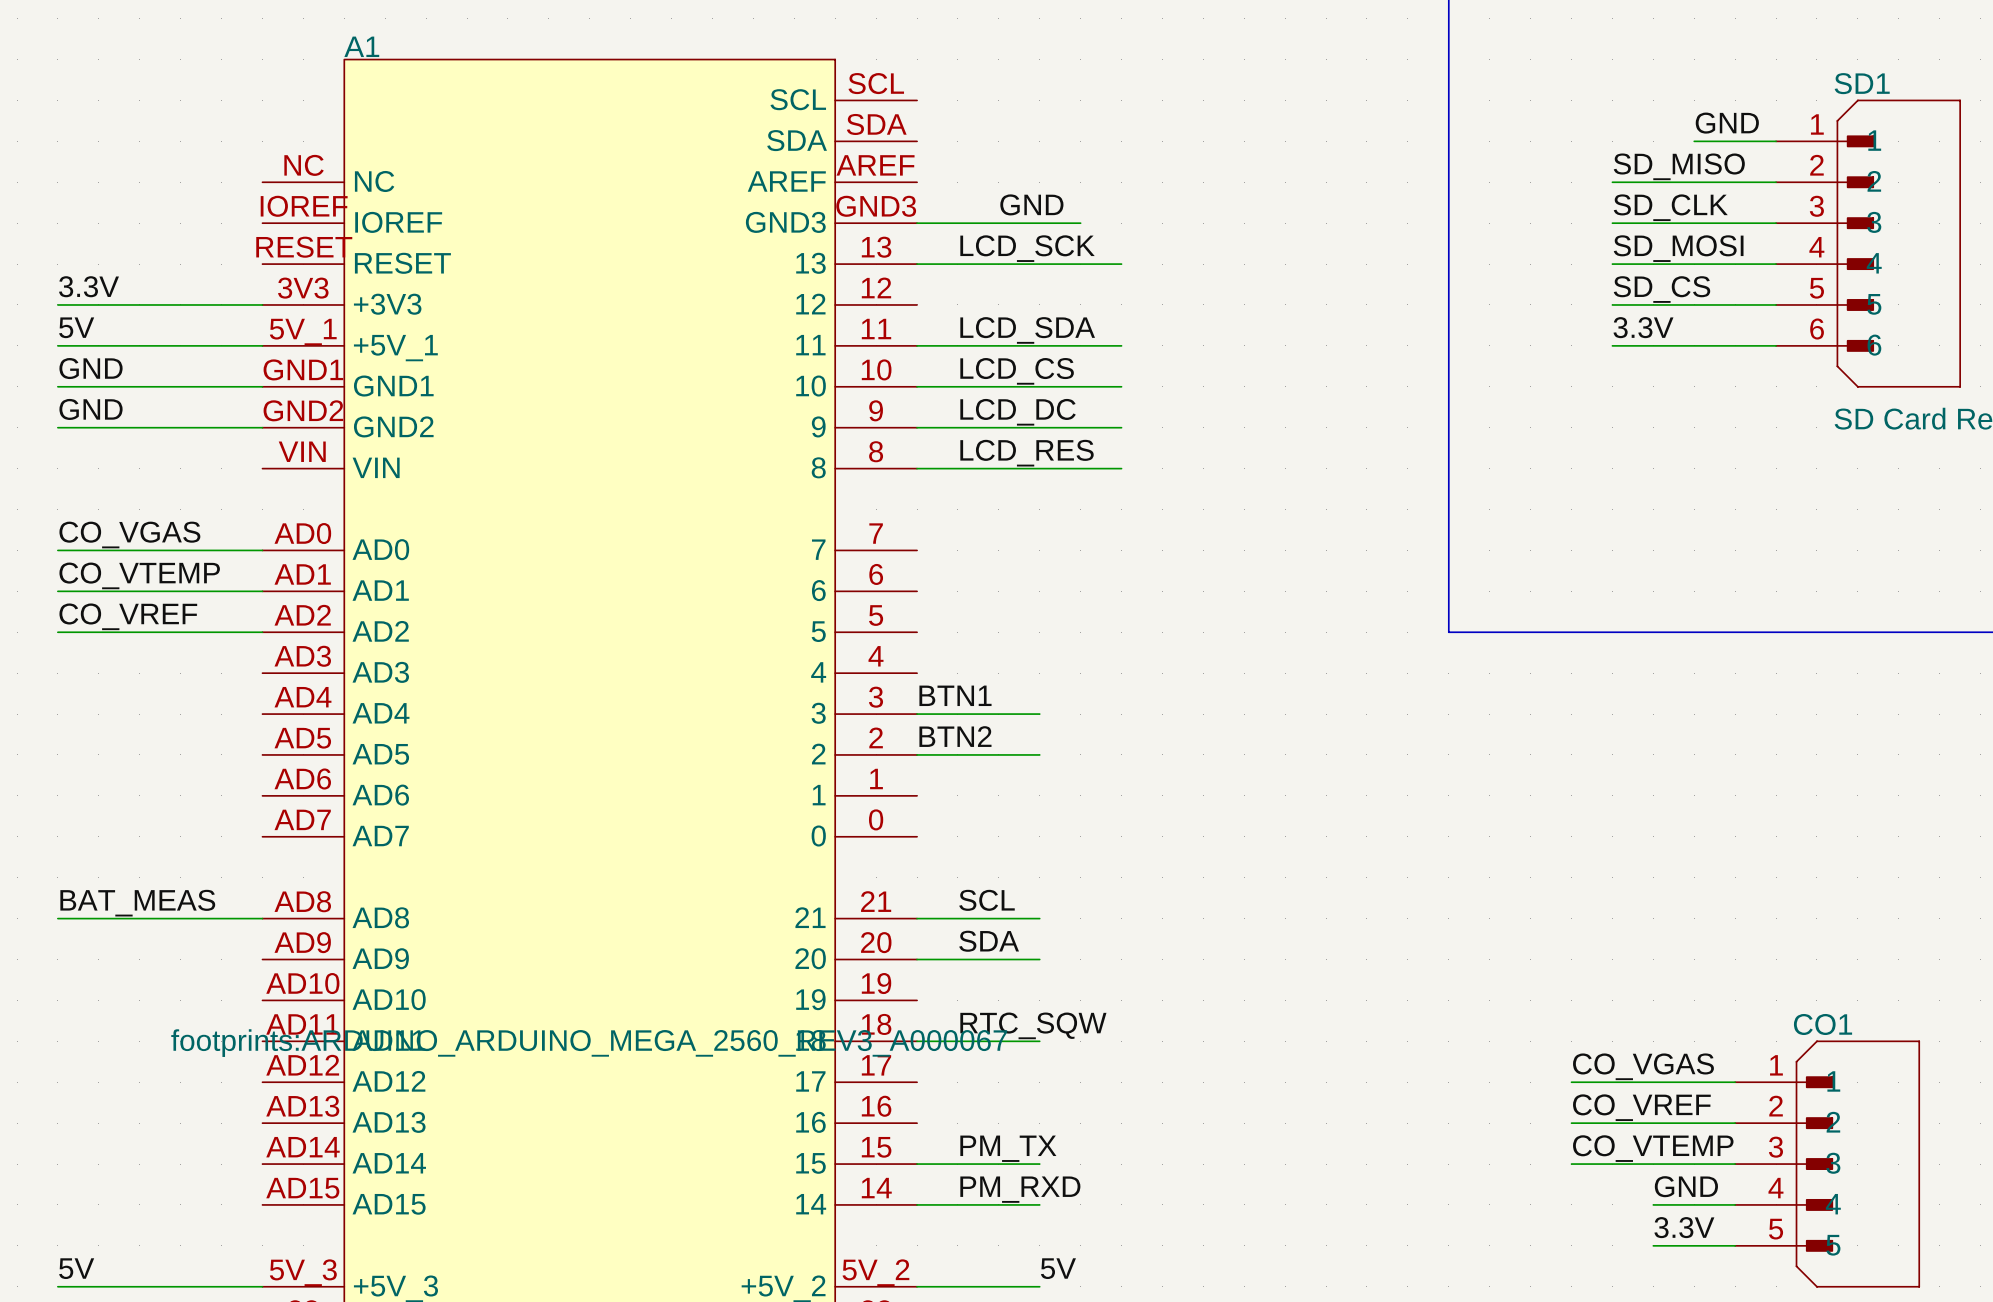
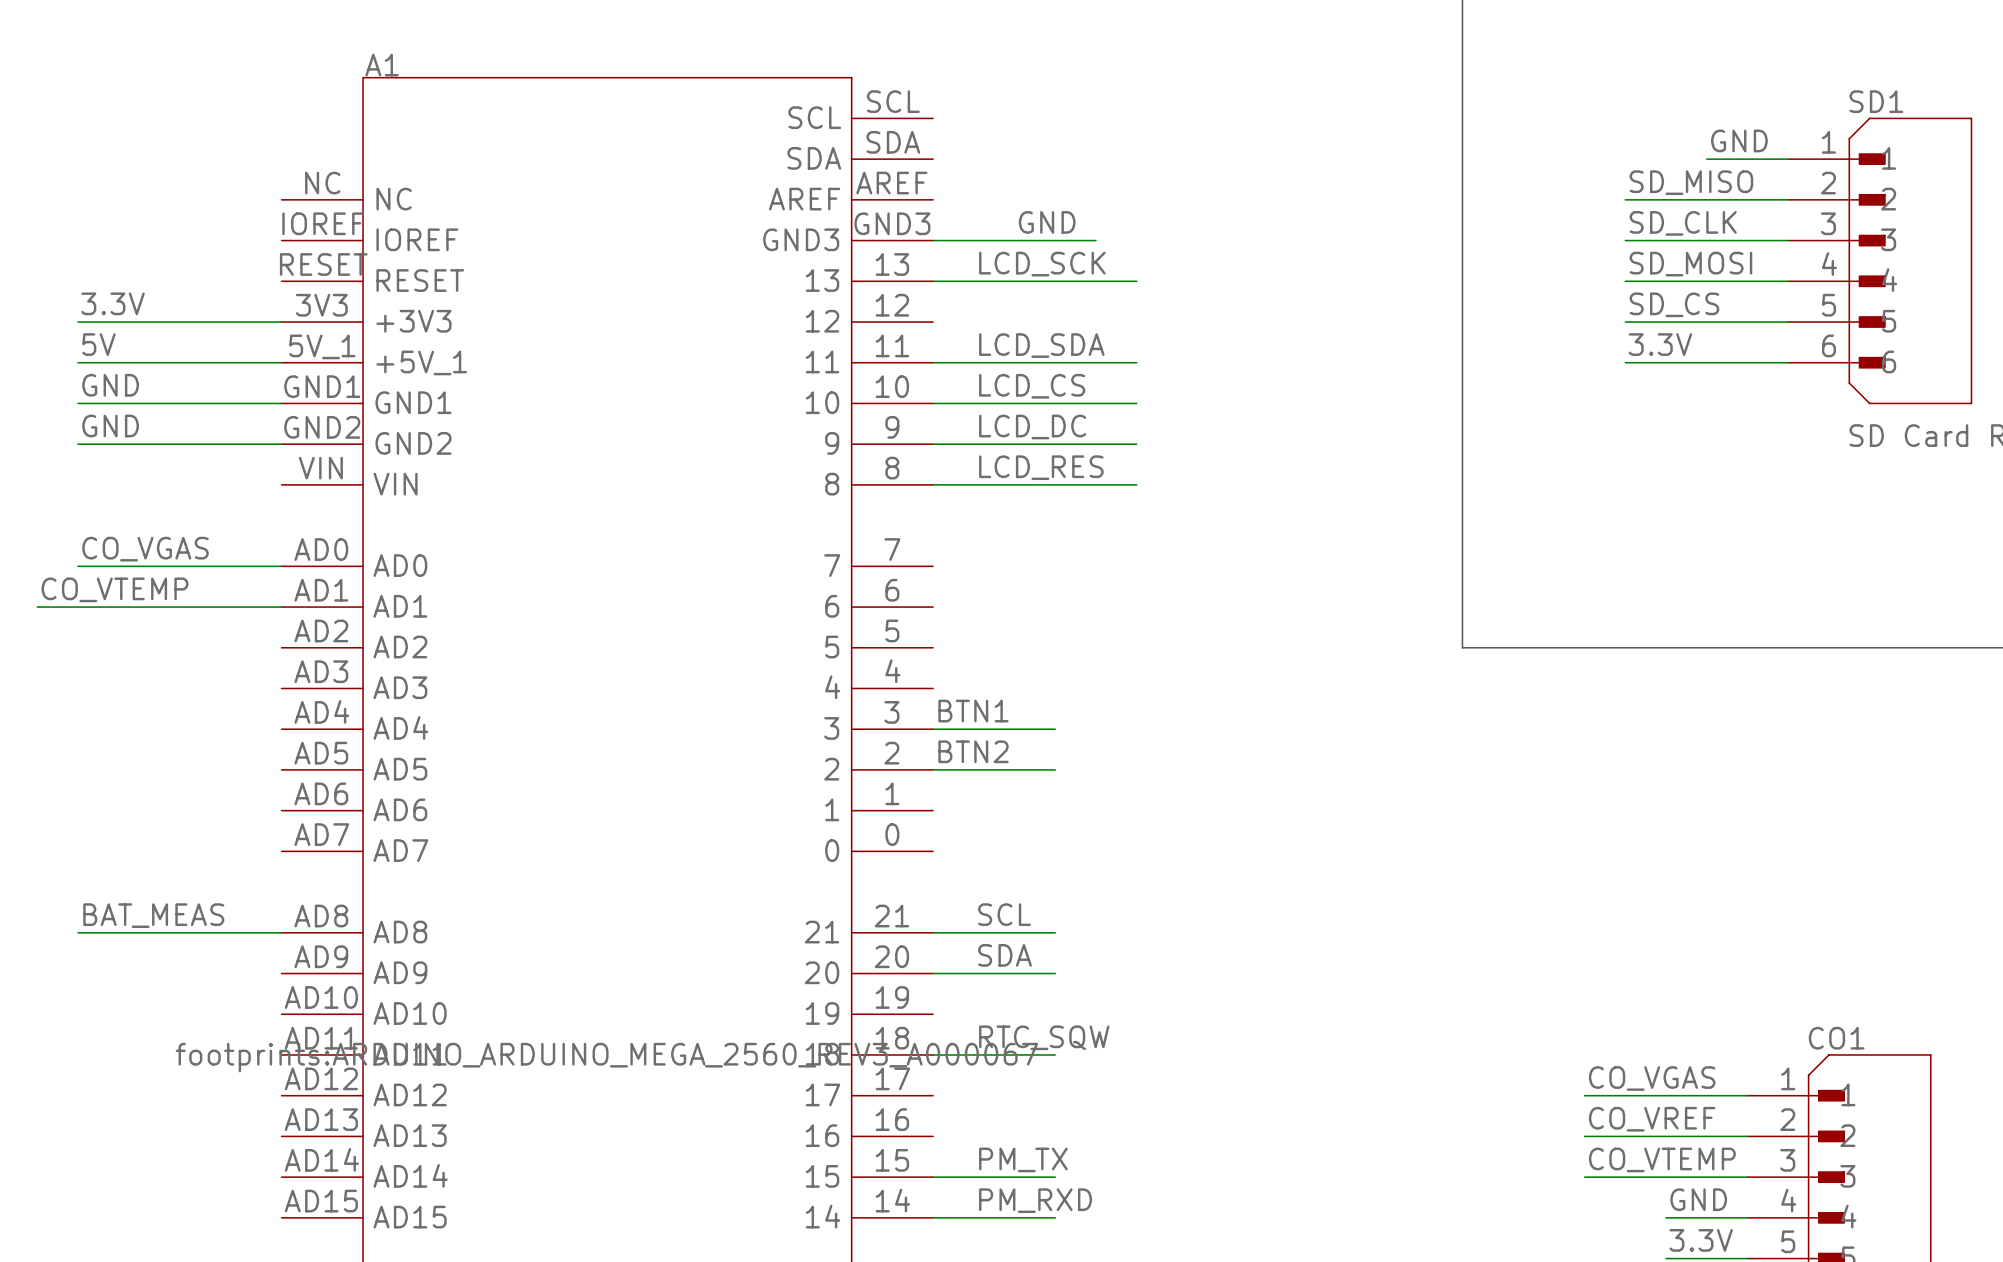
label position: CO_VTEMP (139, 575) -> CO_VTEMP (114, 589)
wire: none -> (37, 607) (77, 607)
label: CO_VREF (128, 616) -> none
wire: (57, 632) (262, 632) -> none

